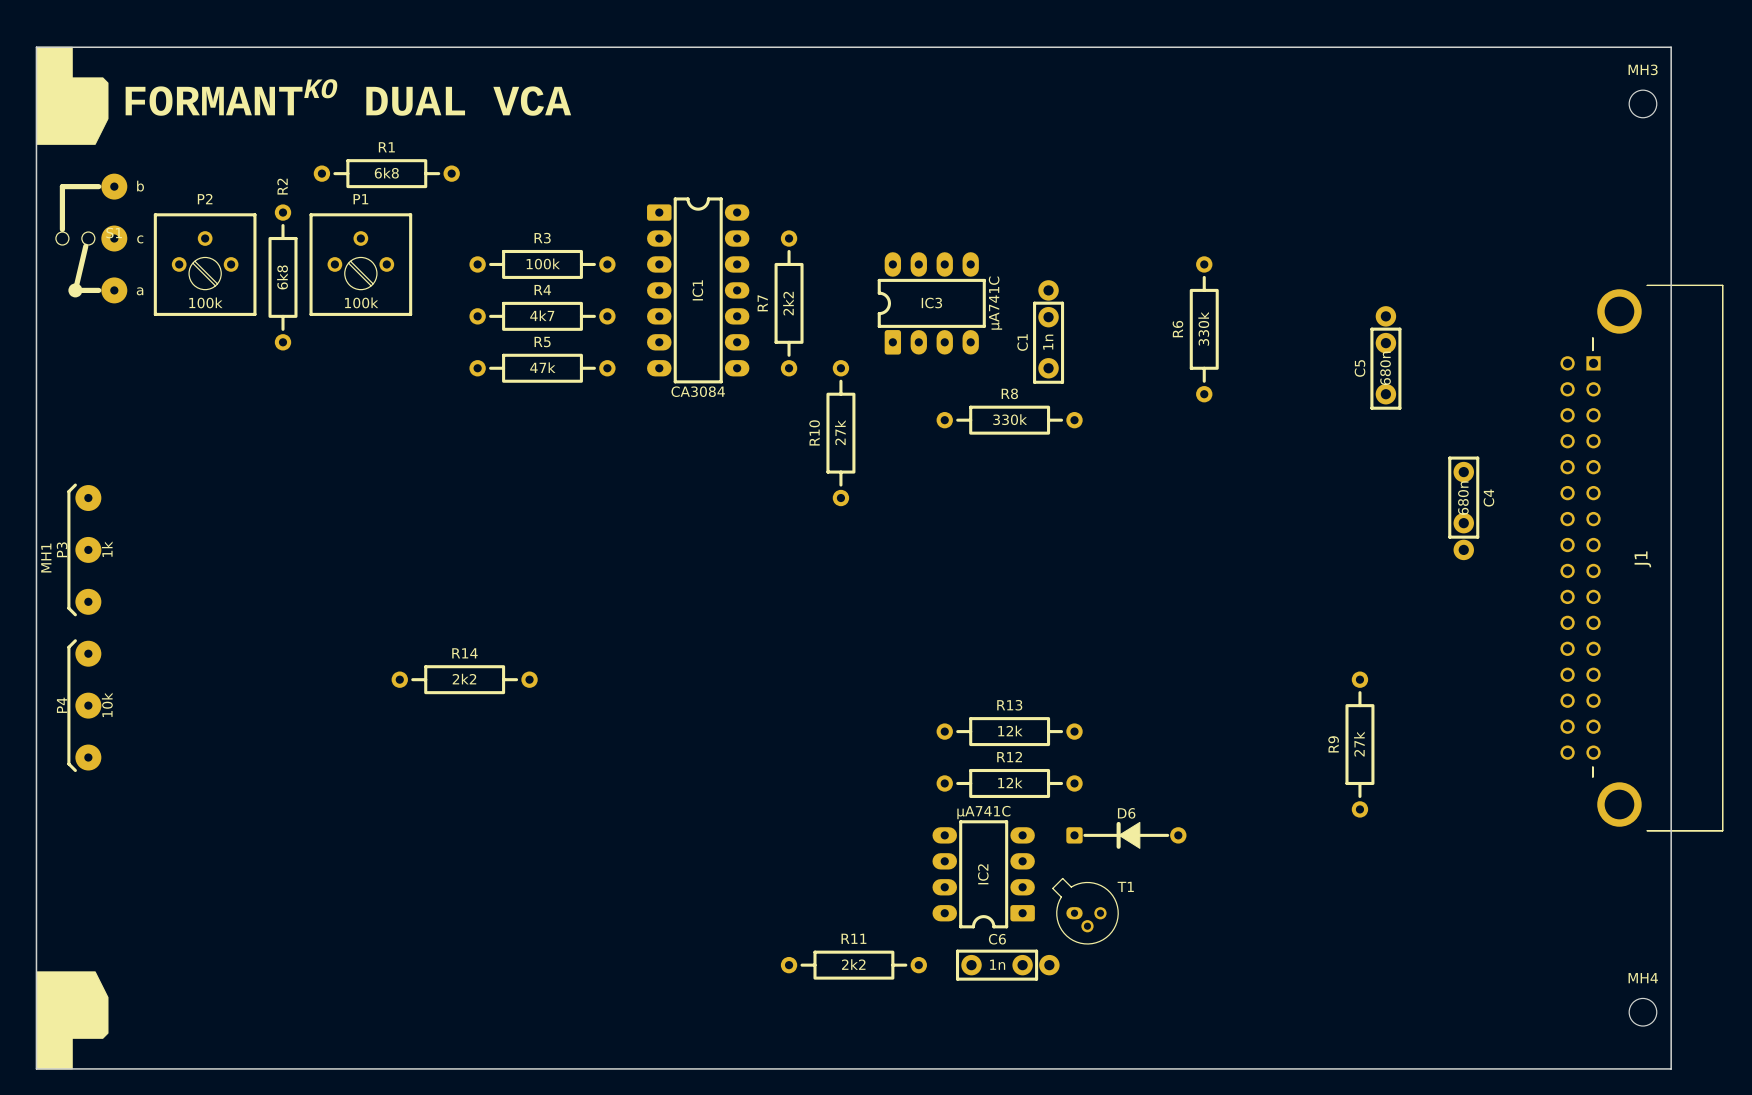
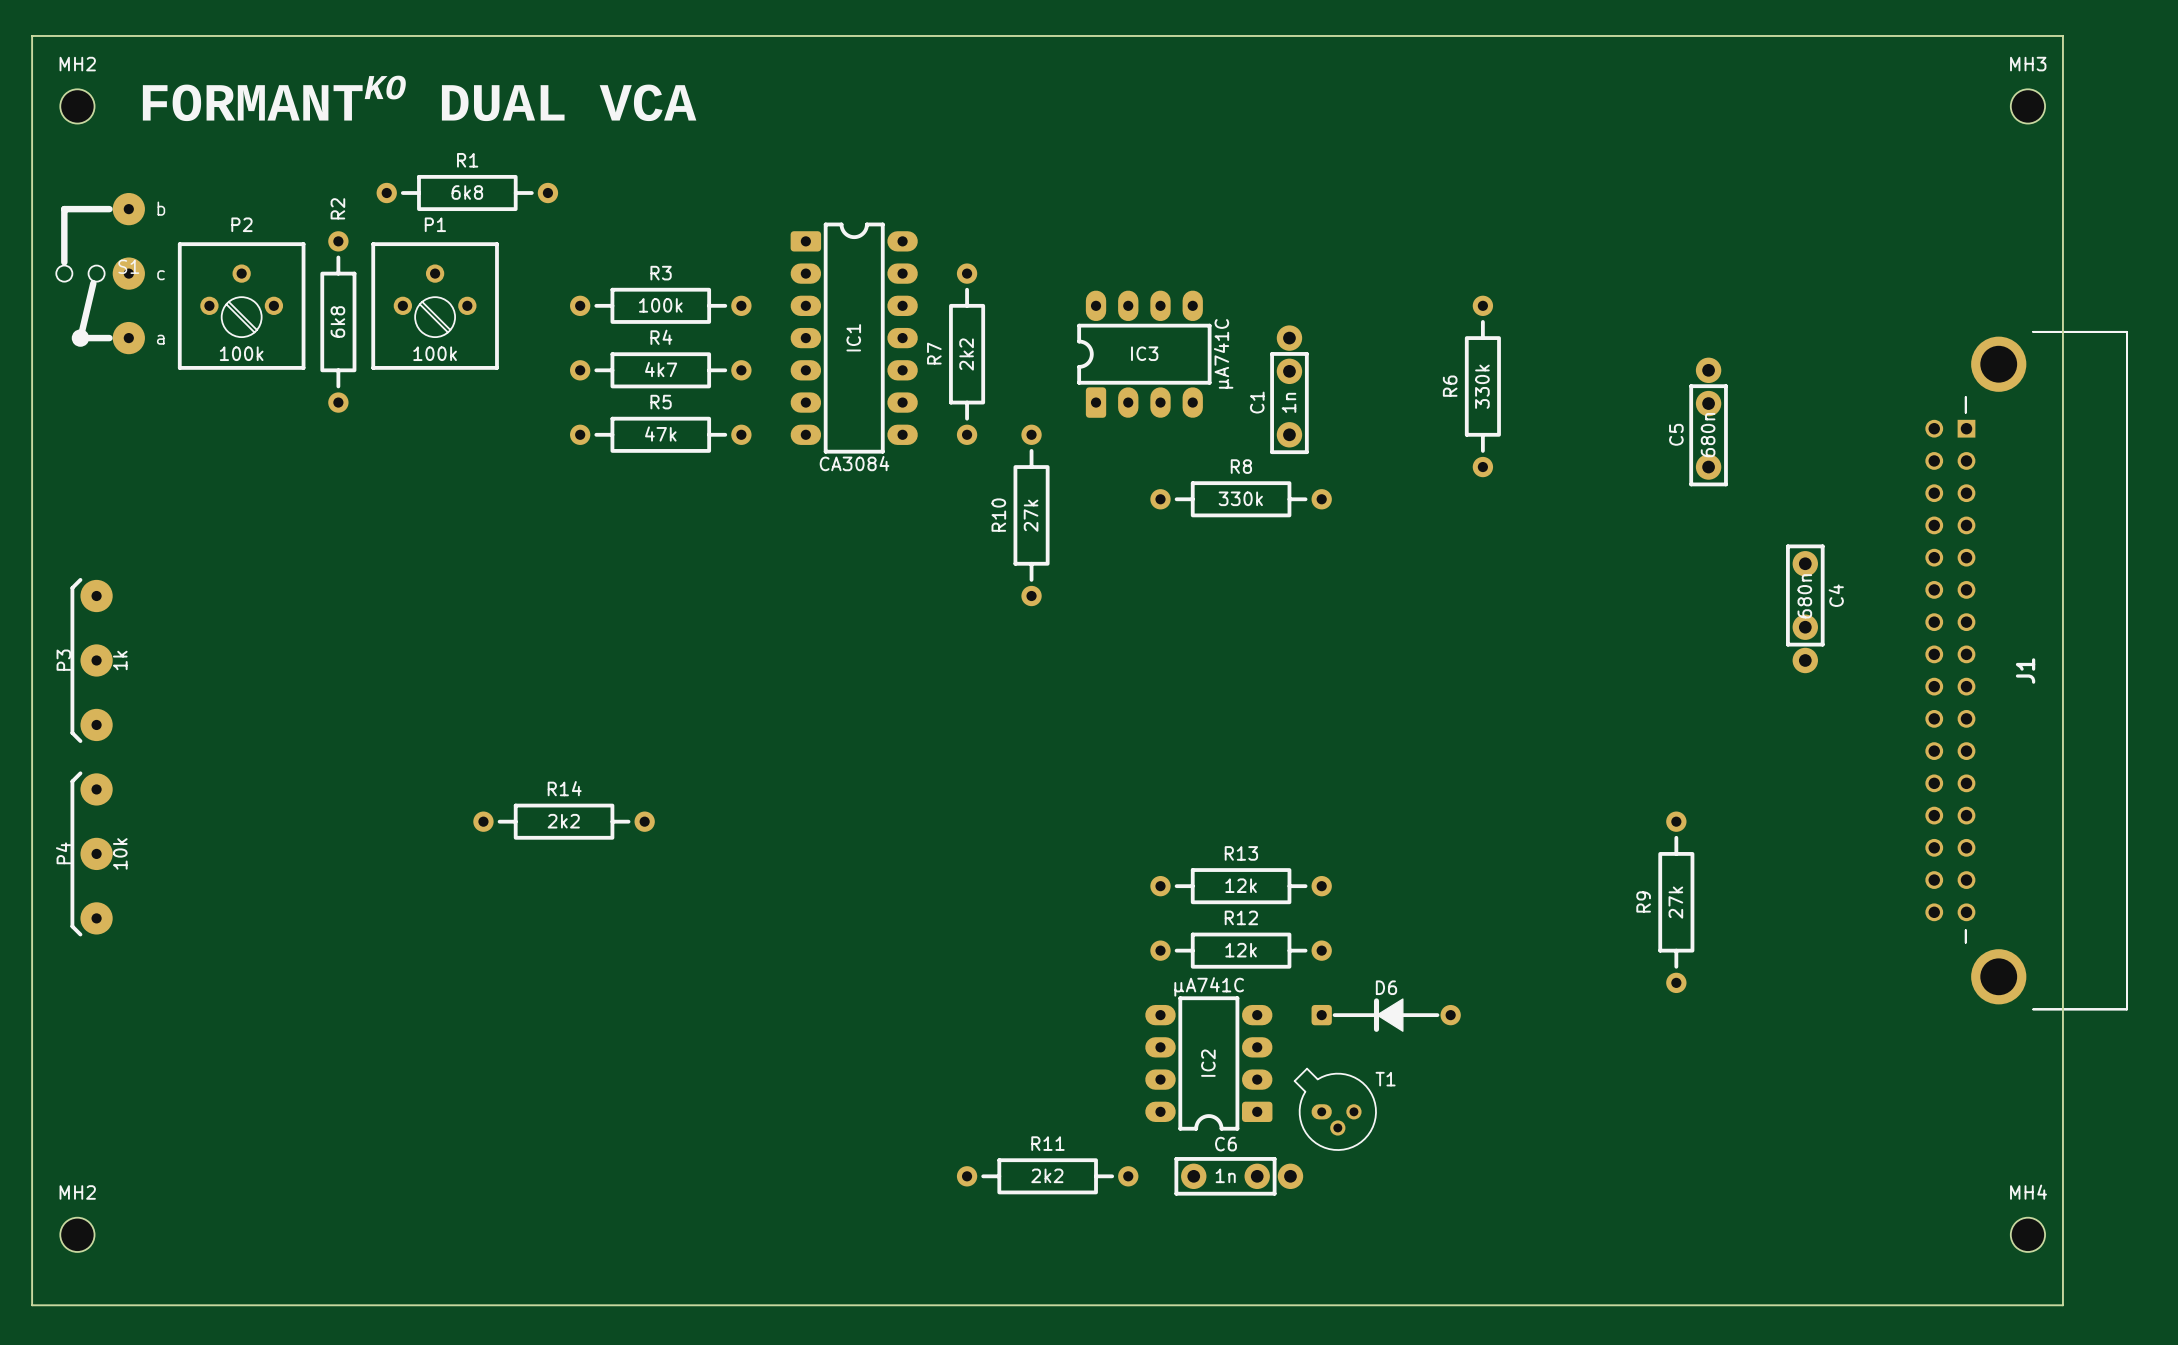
MH2: none -> (77, 106)
MH1: (72, 558) -> none
MH2: none -> (77, 1234)

